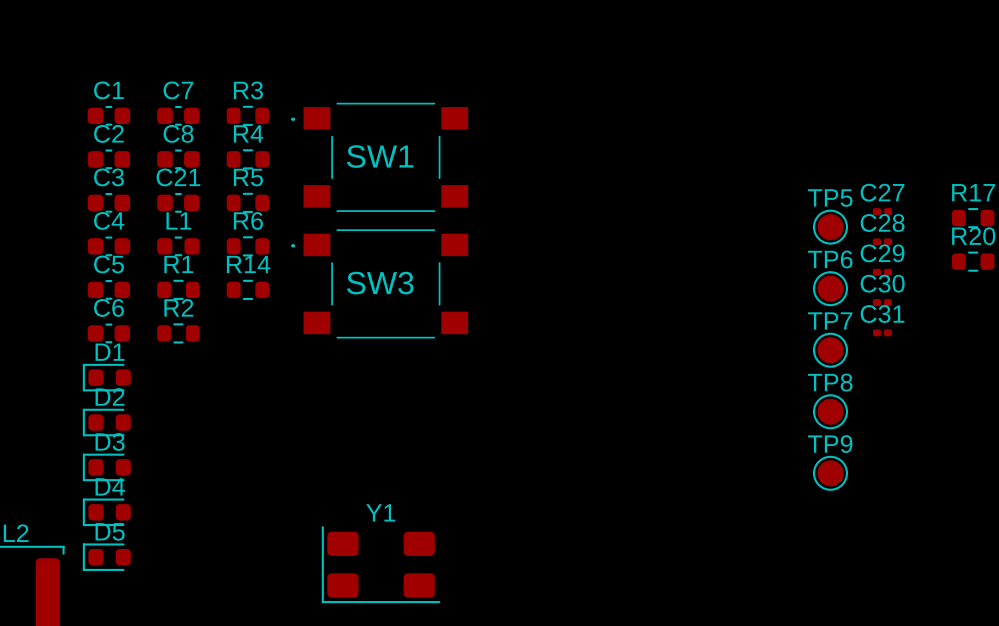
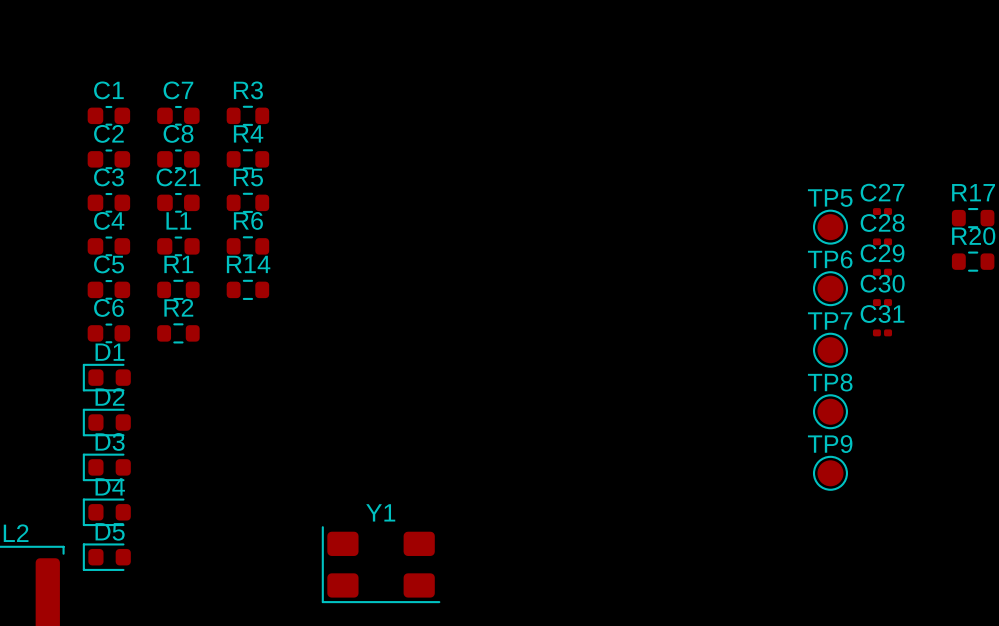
SW1: (379, 157) -> none
SW3: (379, 283) -> none

